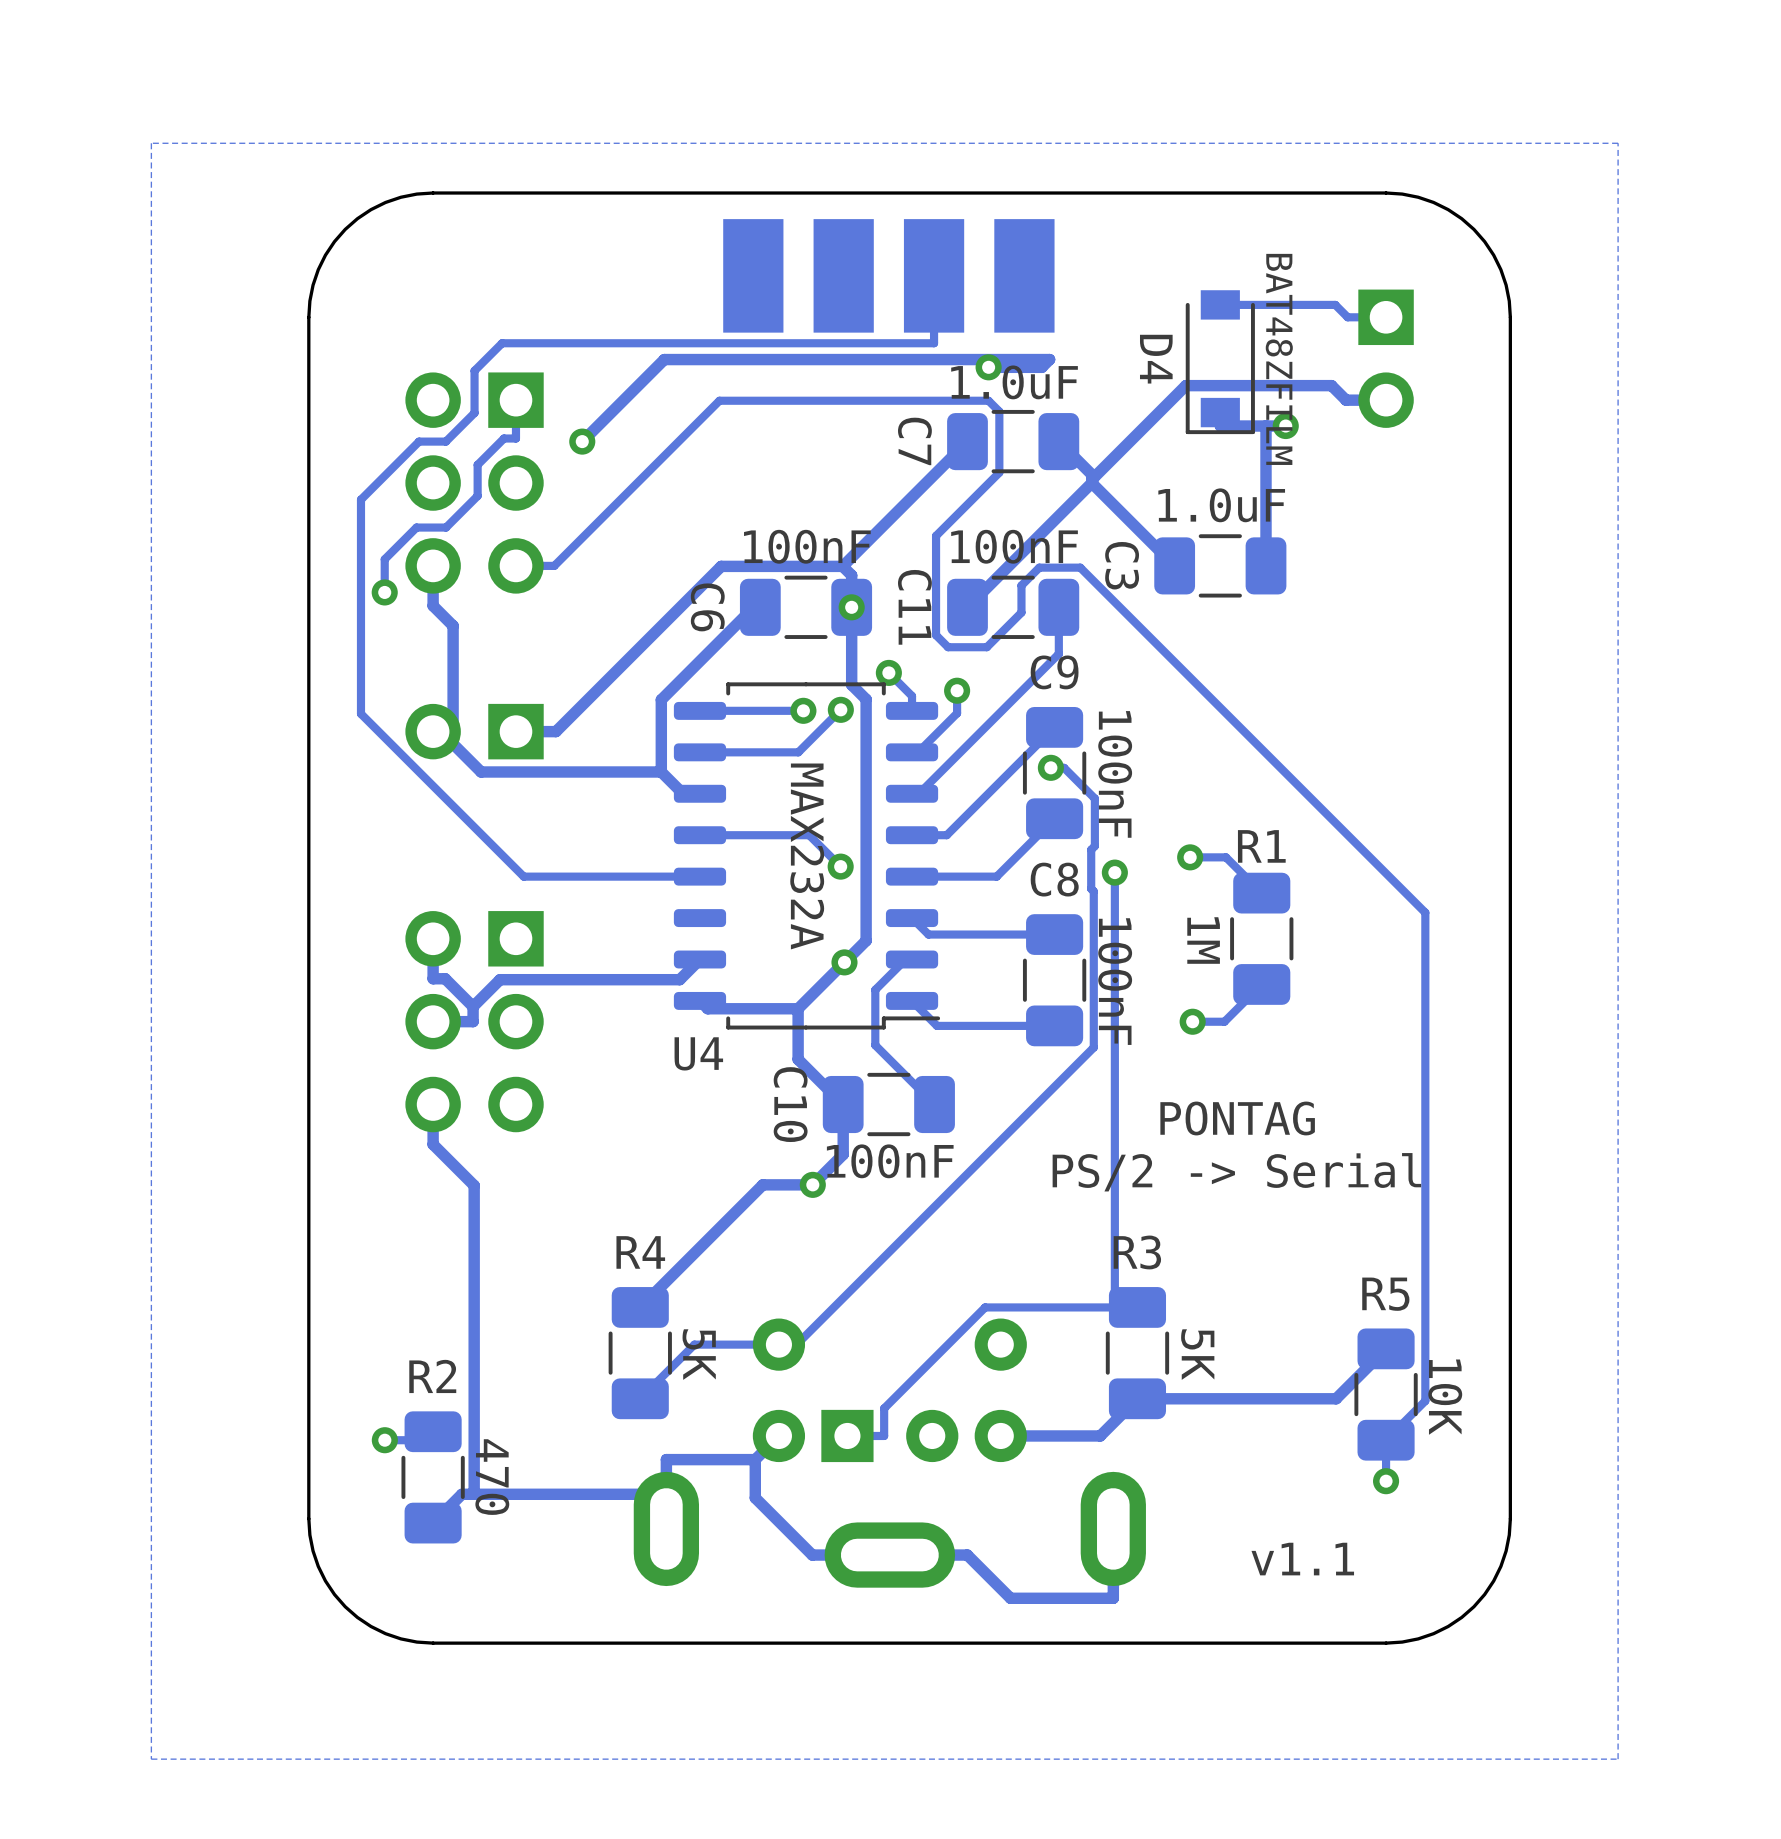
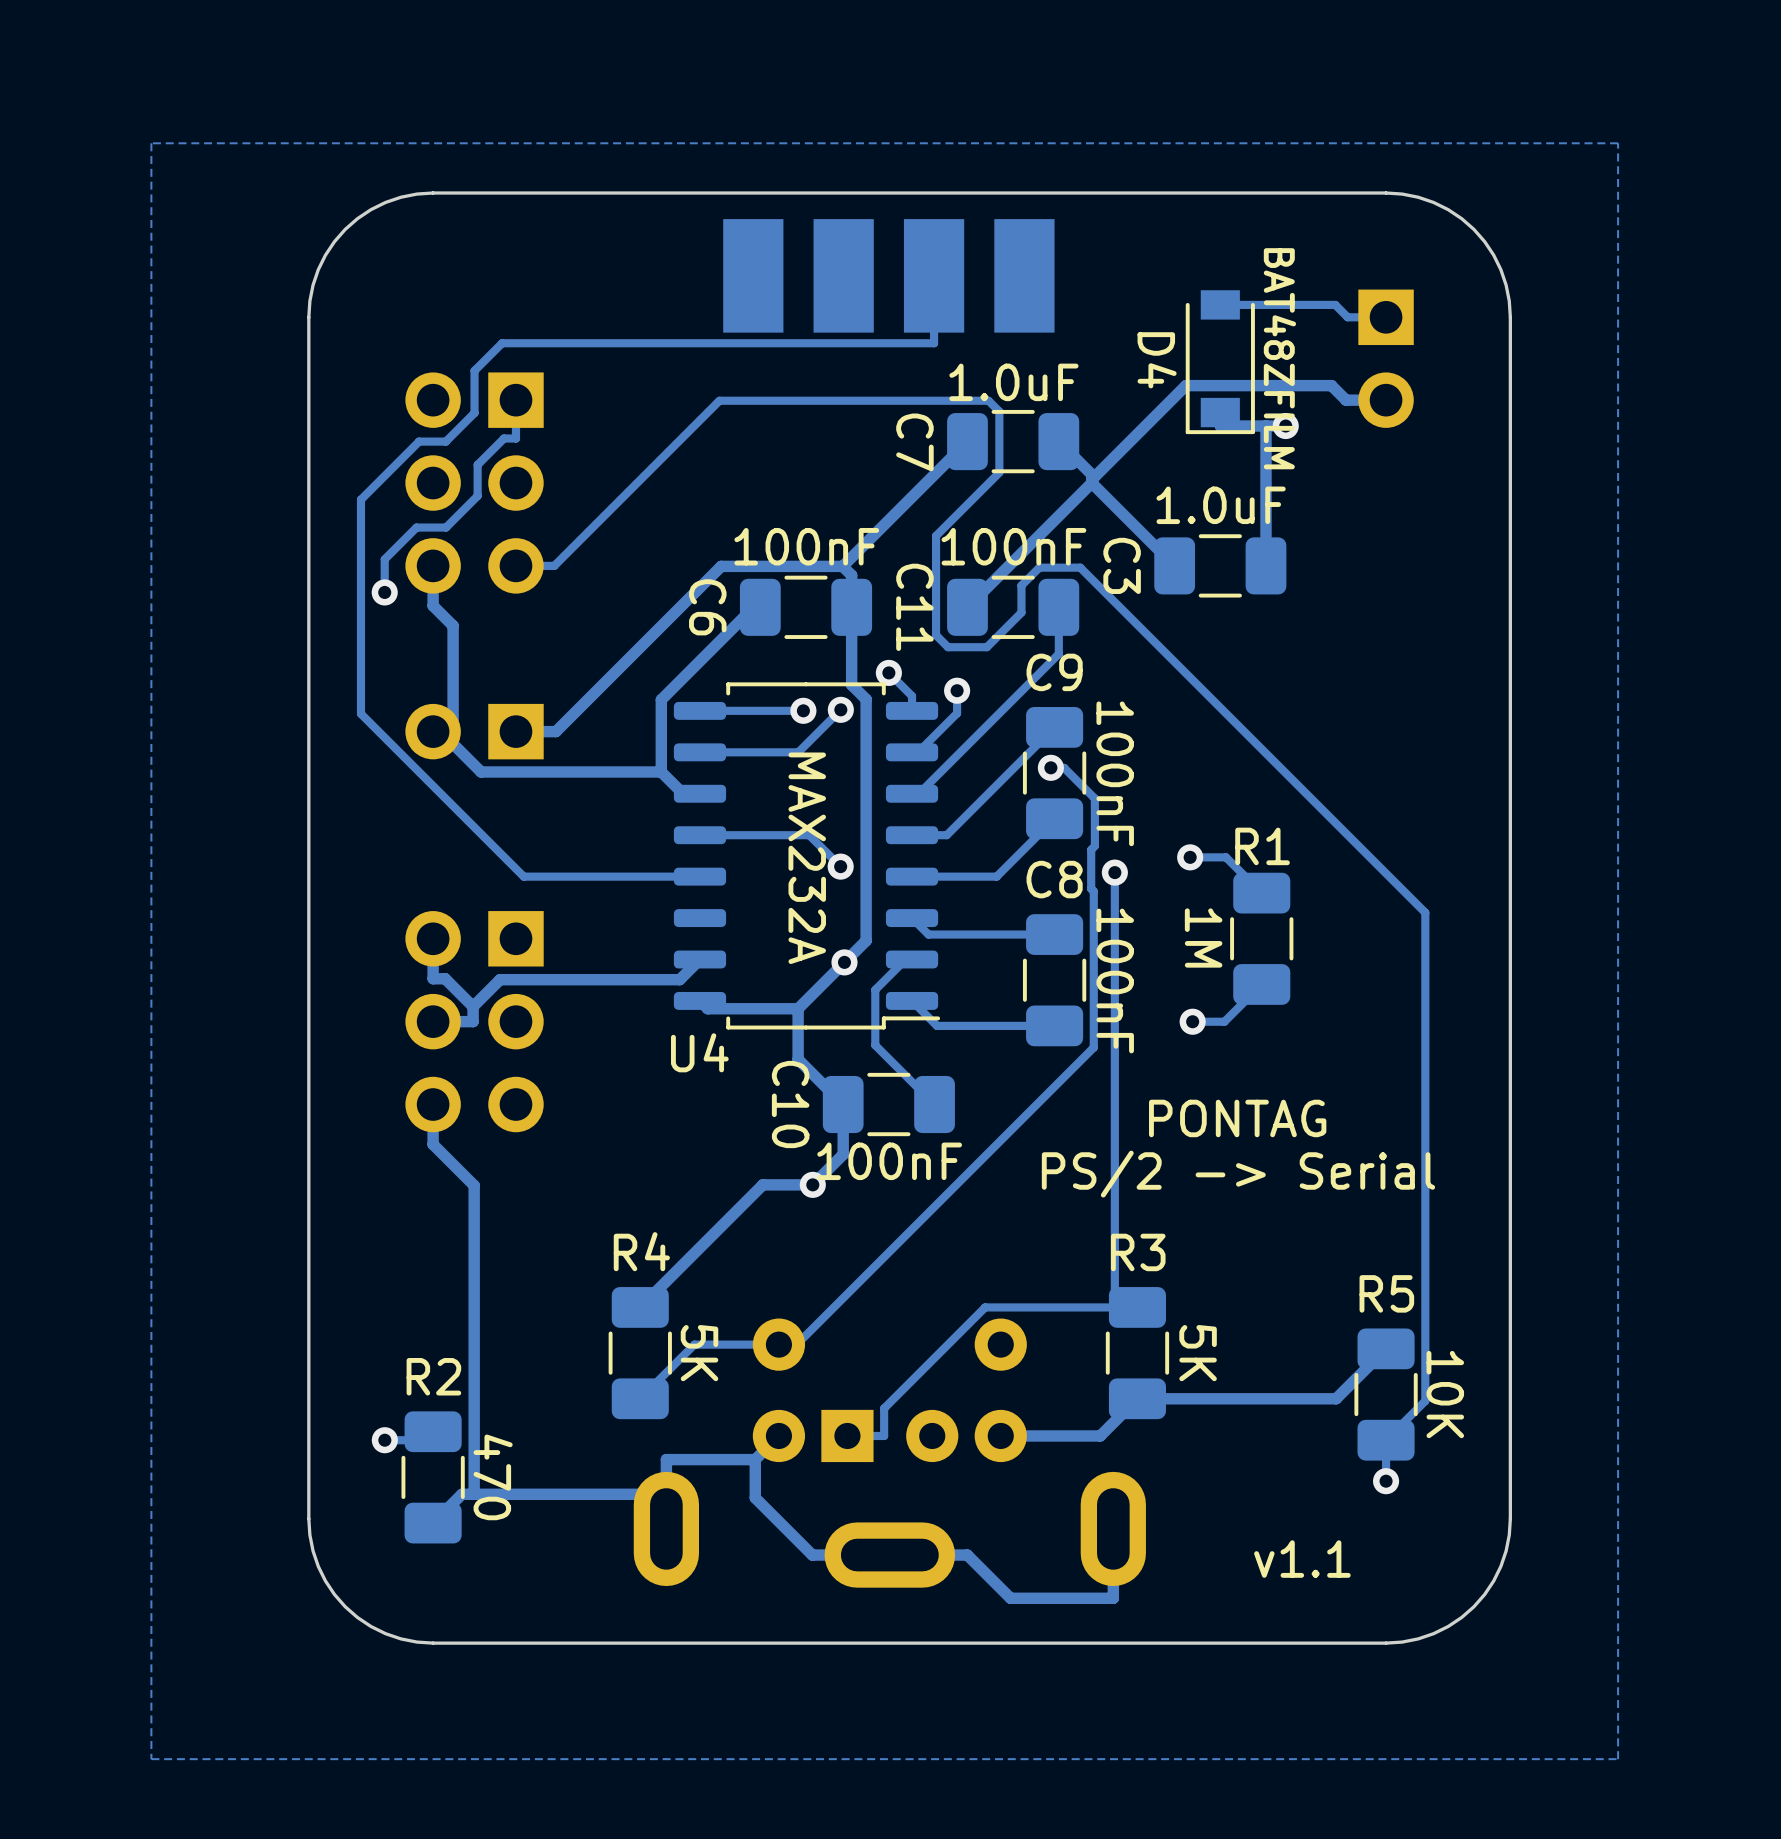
track: (988, 367) (1041, 367) (1049, 359) (664, 359) (582, 441) -> none
via: (988, 367) -> none
via: (582, 441) -> none
via: (851, 607) -> none

